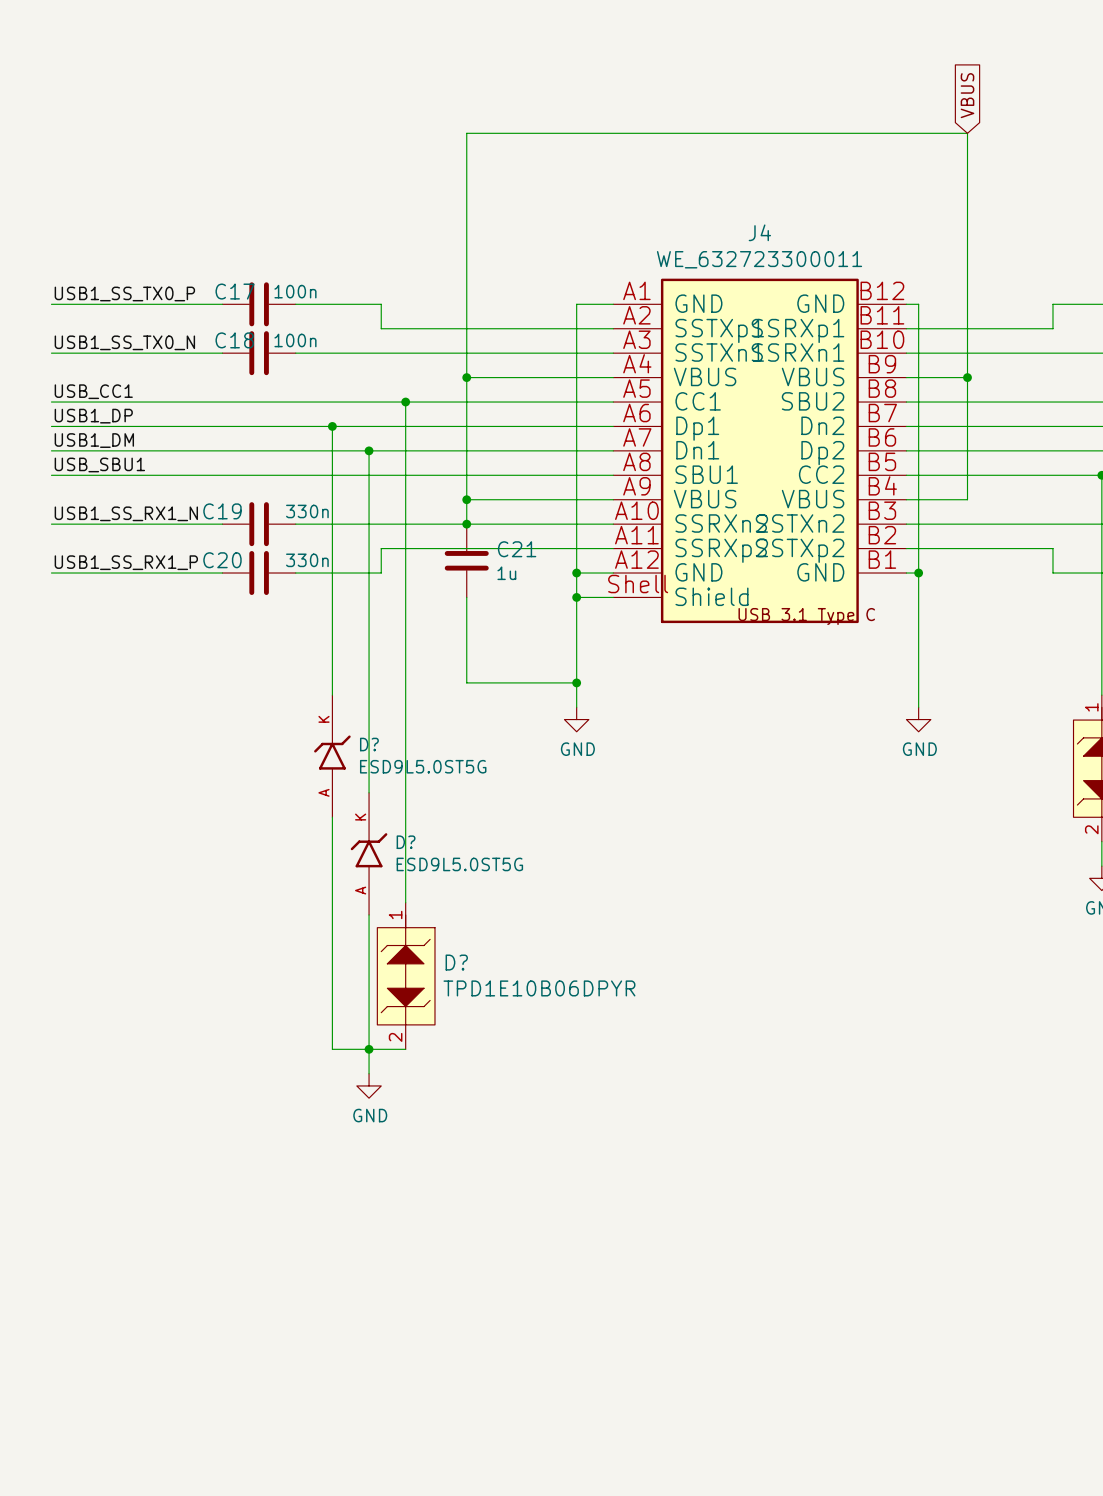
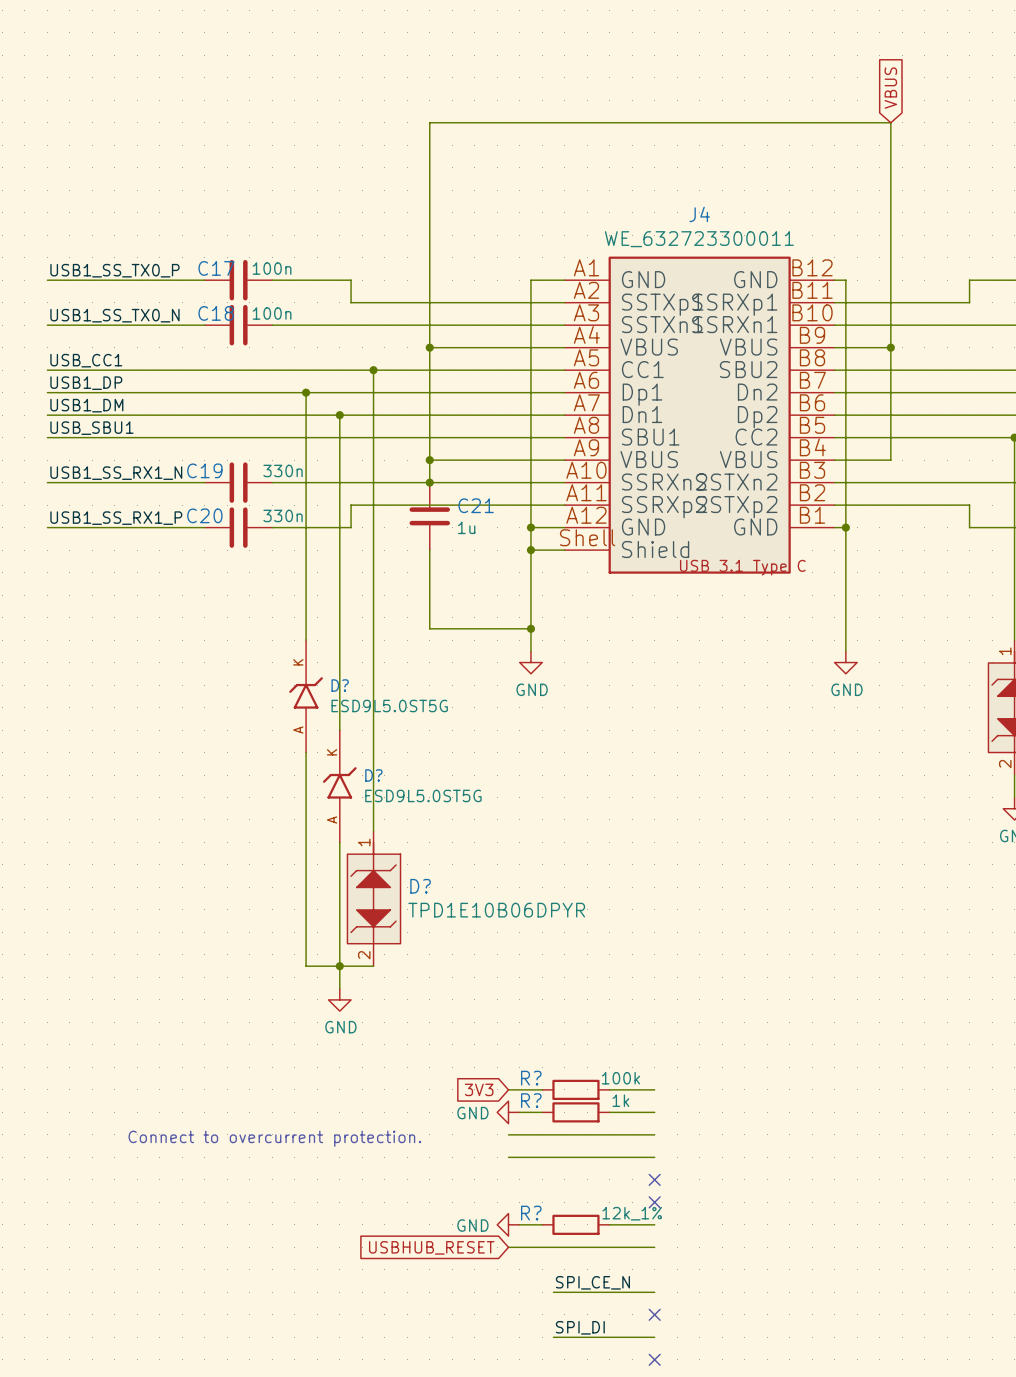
global label: none -> 3V3 (479, 1089)
wire: none -> (508, 1089) (542, 1089)
R?: none -> (575, 1089)
wire: none -> (609, 1089) (654, 1089)
power symbol: none -> GND (508, 1112)
wire: none -> (519, 1112) (542, 1112)
R?: none -> (575, 1112)
wire: none -> (609, 1112) (654, 1112)
wire: none -> (508, 1134) (654, 1134)
text: none -> Connect to overcurrent protection. (274, 1138)
wire: none -> (508, 1157) (654, 1157)
no-connect mark: none -> (654, 1179)
no-connect mark: none -> (654, 1202)
power symbol: none -> GND (508, 1224)
wire: none -> (519, 1224) (542, 1224)
R?: none -> (575, 1224)
wire: none -> (609, 1224) (654, 1224)
wire: none -> (508, 1247) (654, 1247)
global label: none -> USBHUB_RESET (431, 1247)
label: none -> SPI_CE_N (592, 1282)
wire: none -> (553, 1292) (654, 1292)
no-connect mark: none -> (654, 1314)
label: none -> SPI_DI (580, 1327)
wire: none -> (553, 1337) (654, 1337)
no-connect mark: none -> (654, 1359)

